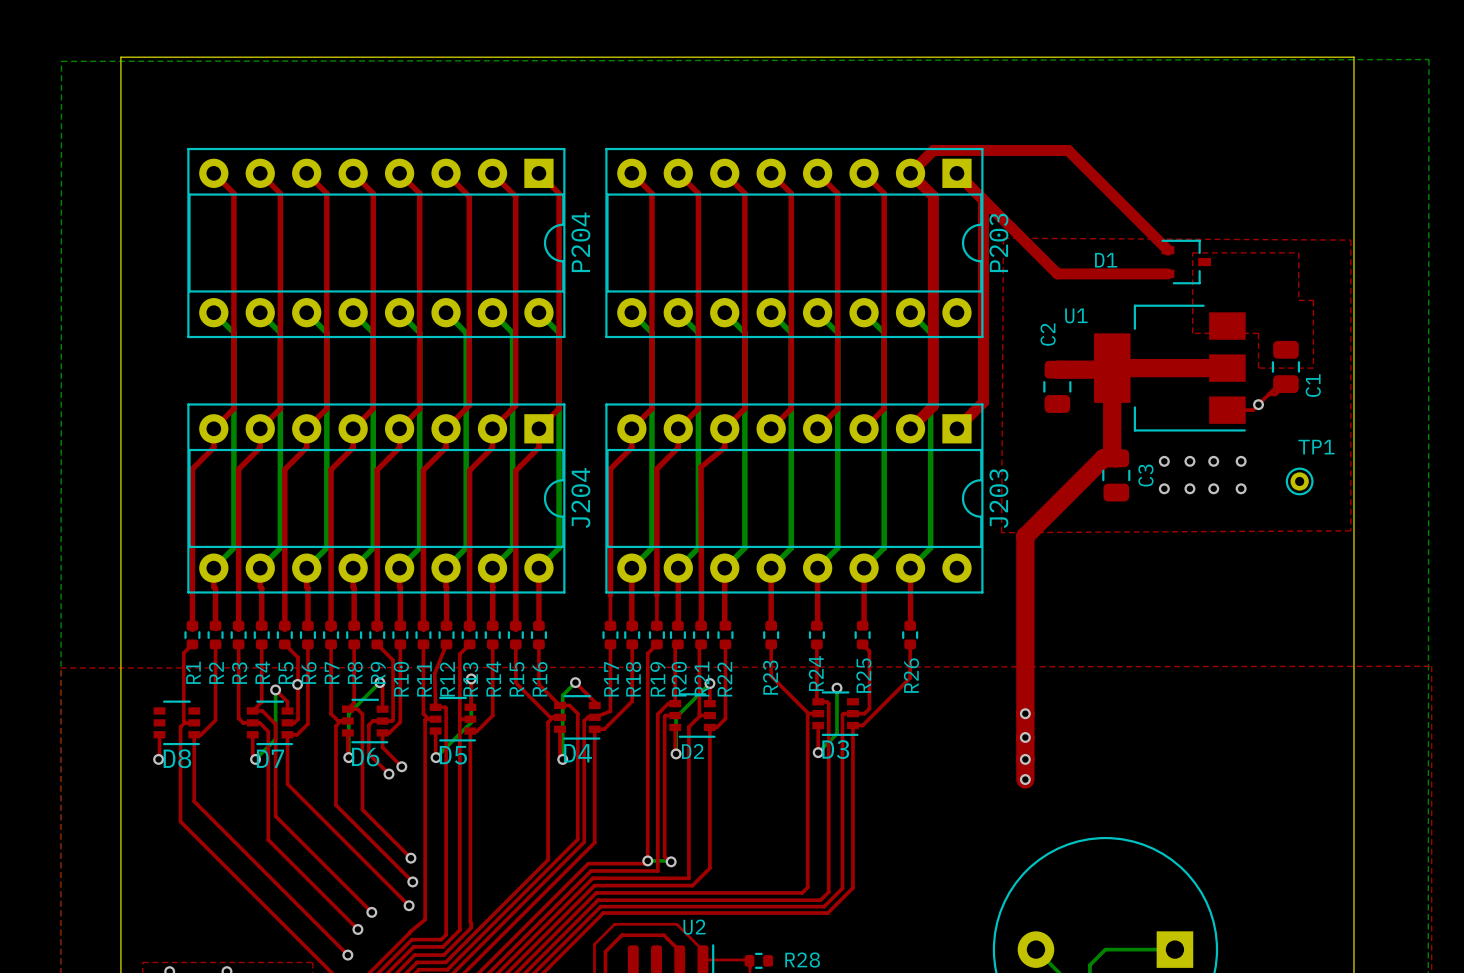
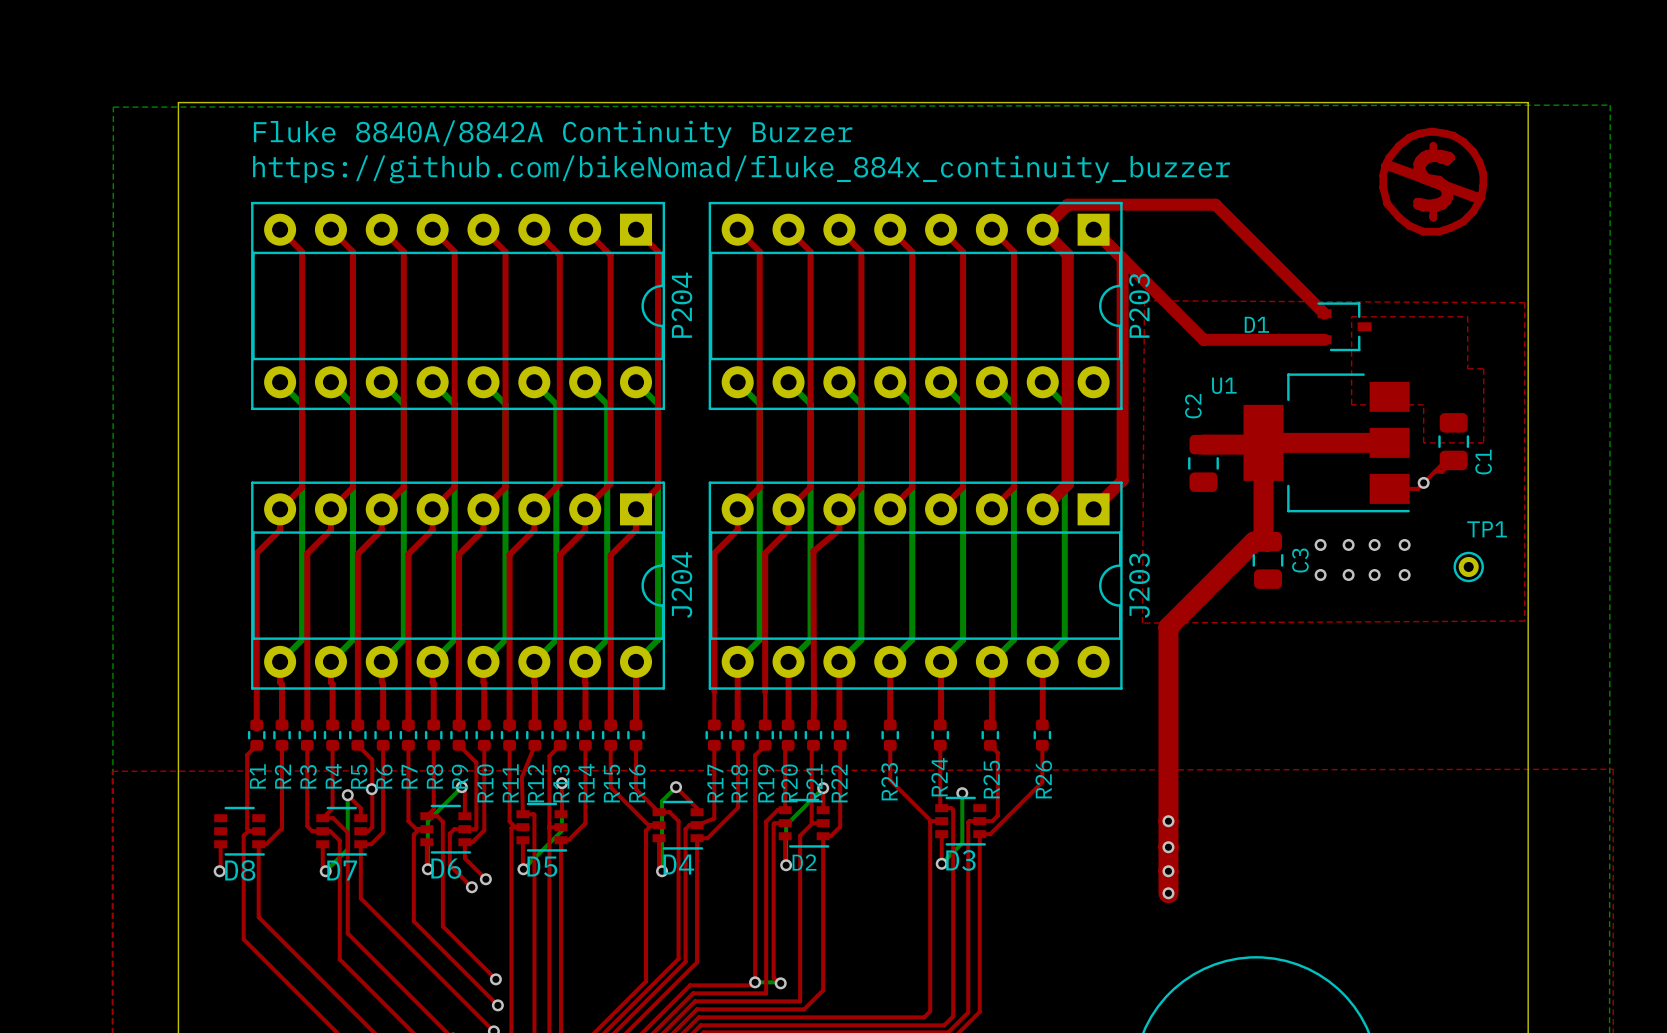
drawing: none -> [1379, 127, 1488, 236]
text: none -> Fluke 8840A/8842A Continuity Buzzer (553, 134)
text: none -> https://github.com/bikeNomad/fluke_884x_continuity_buzzer (741, 169)

